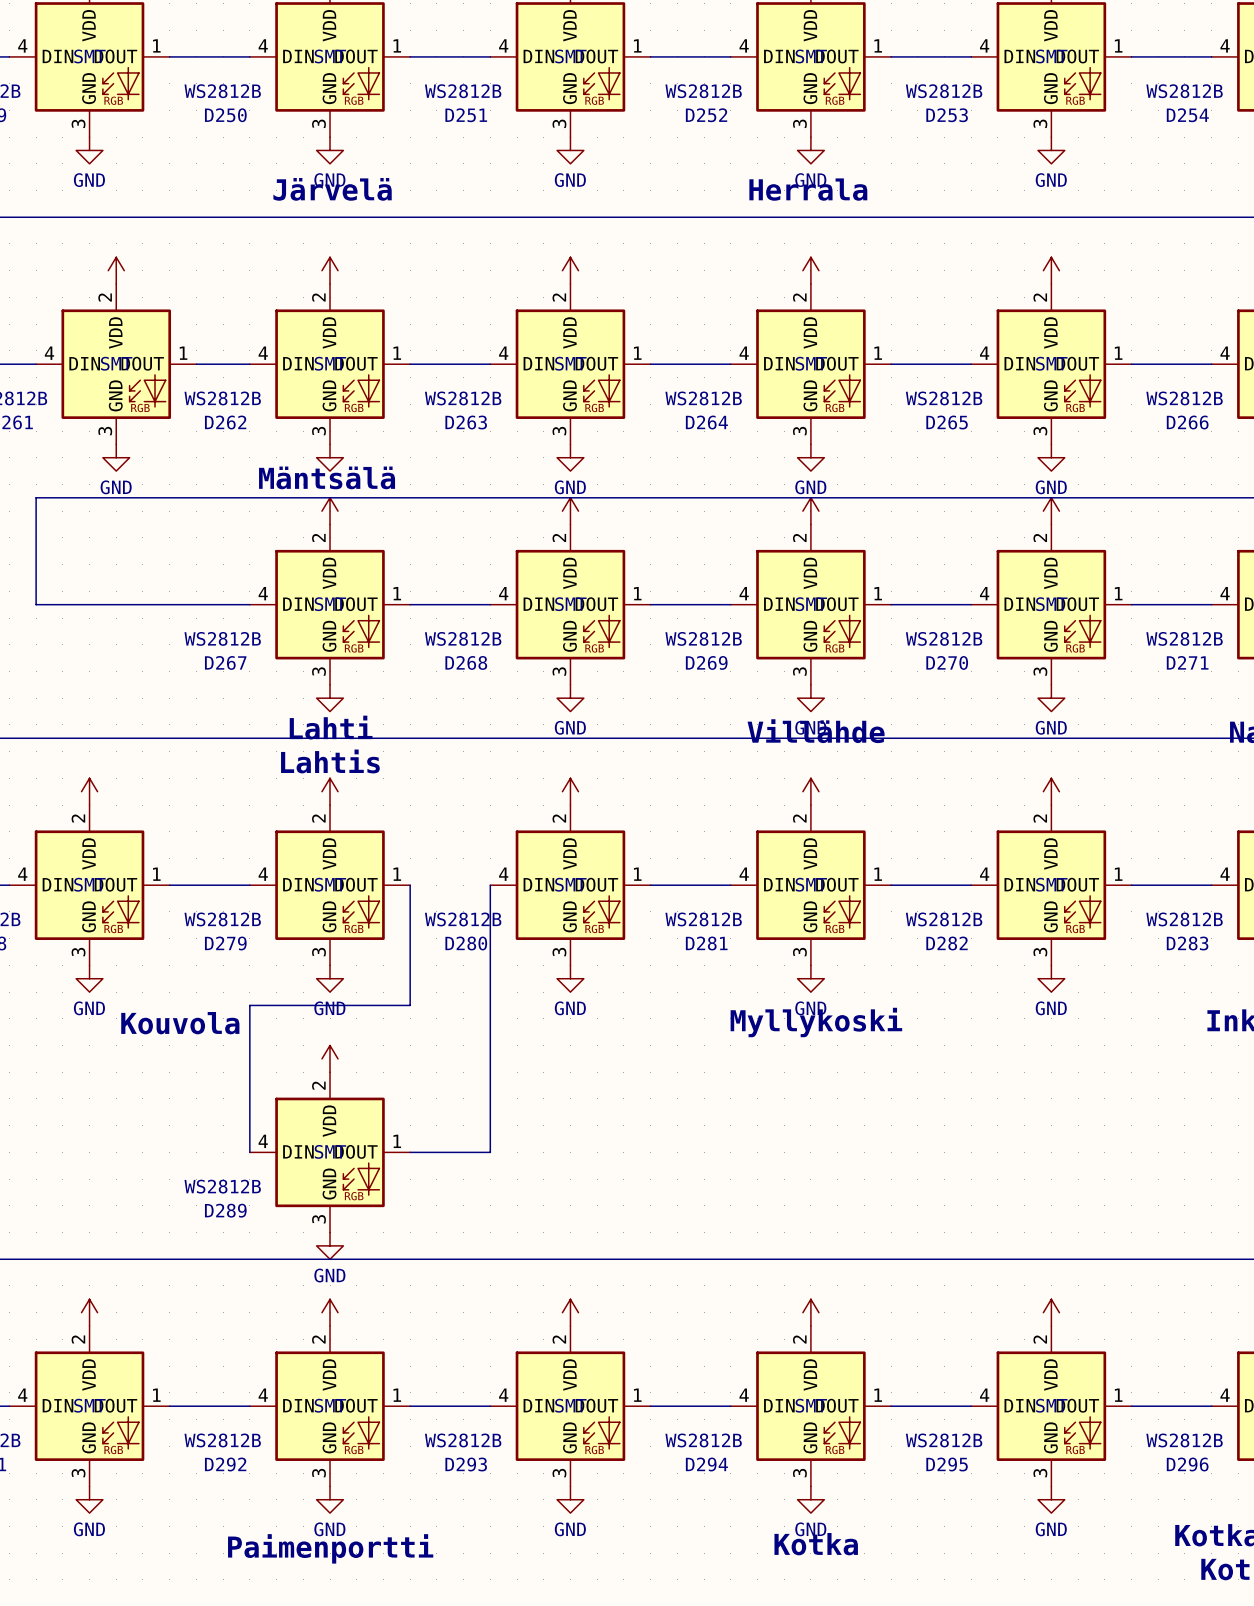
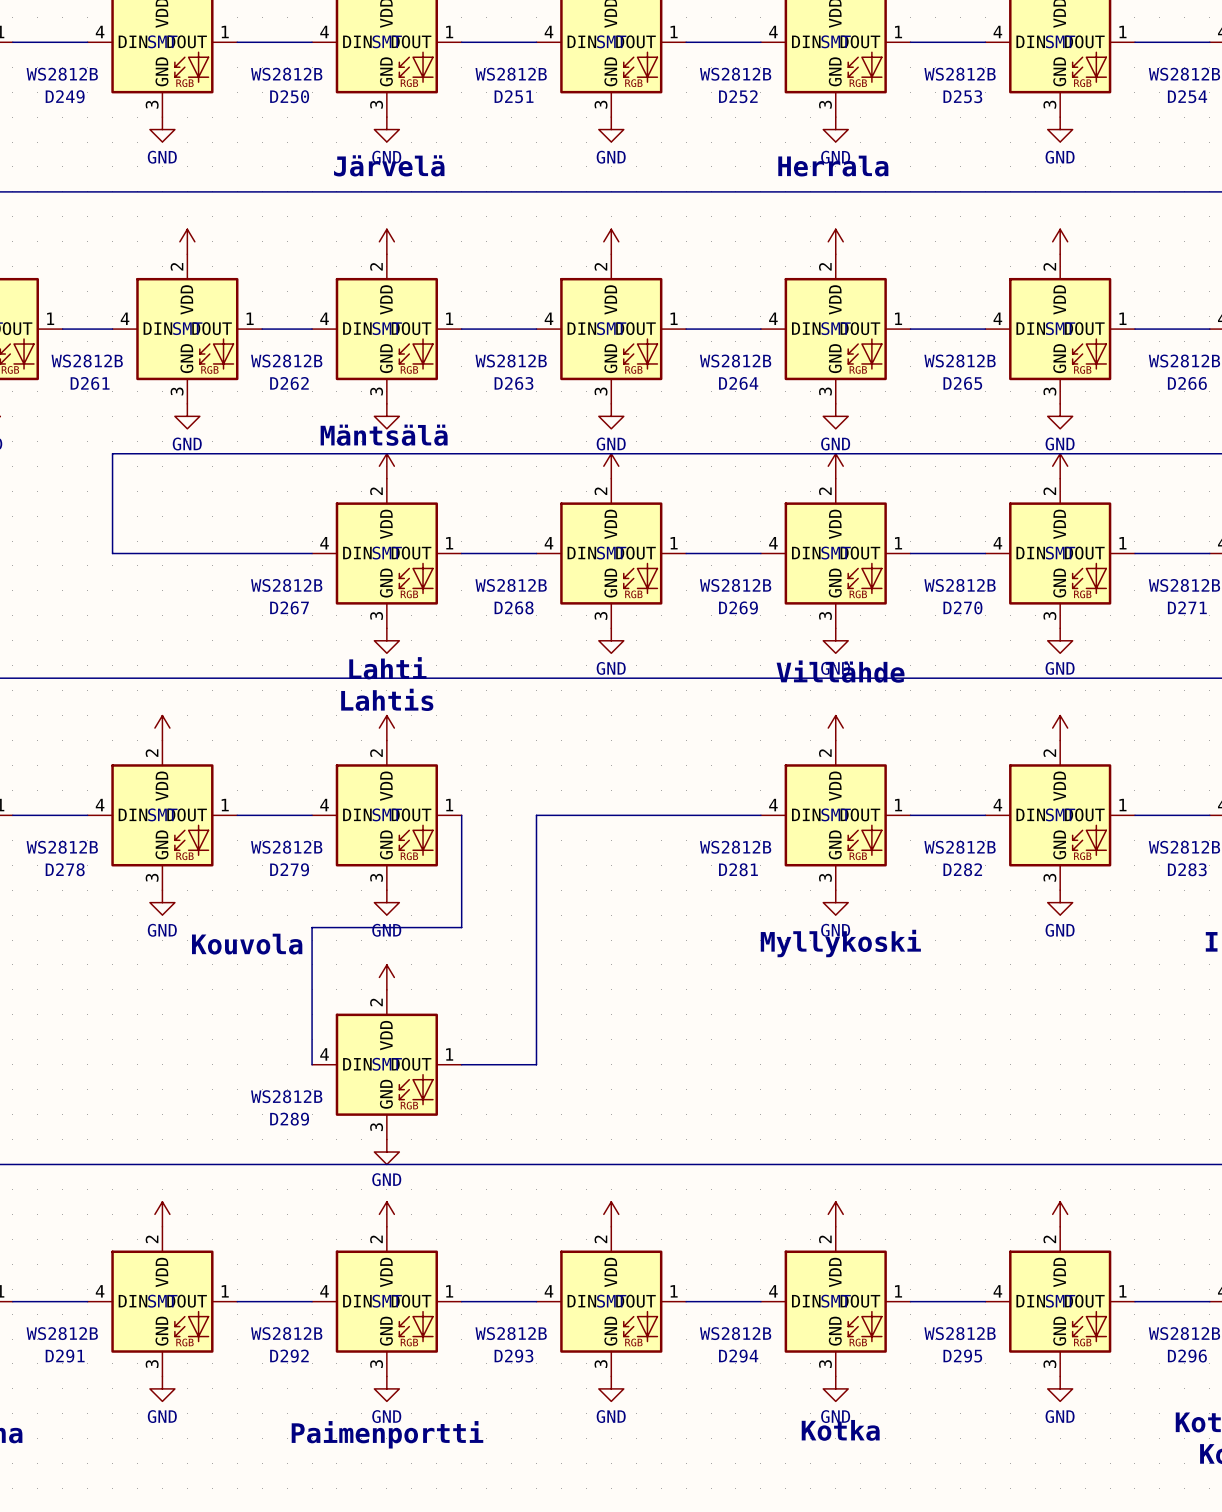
power symbol: (570, 791) -> none
D280: WS2812B (570, 885) -> none
power symbol: GND (570, 978) -> none

